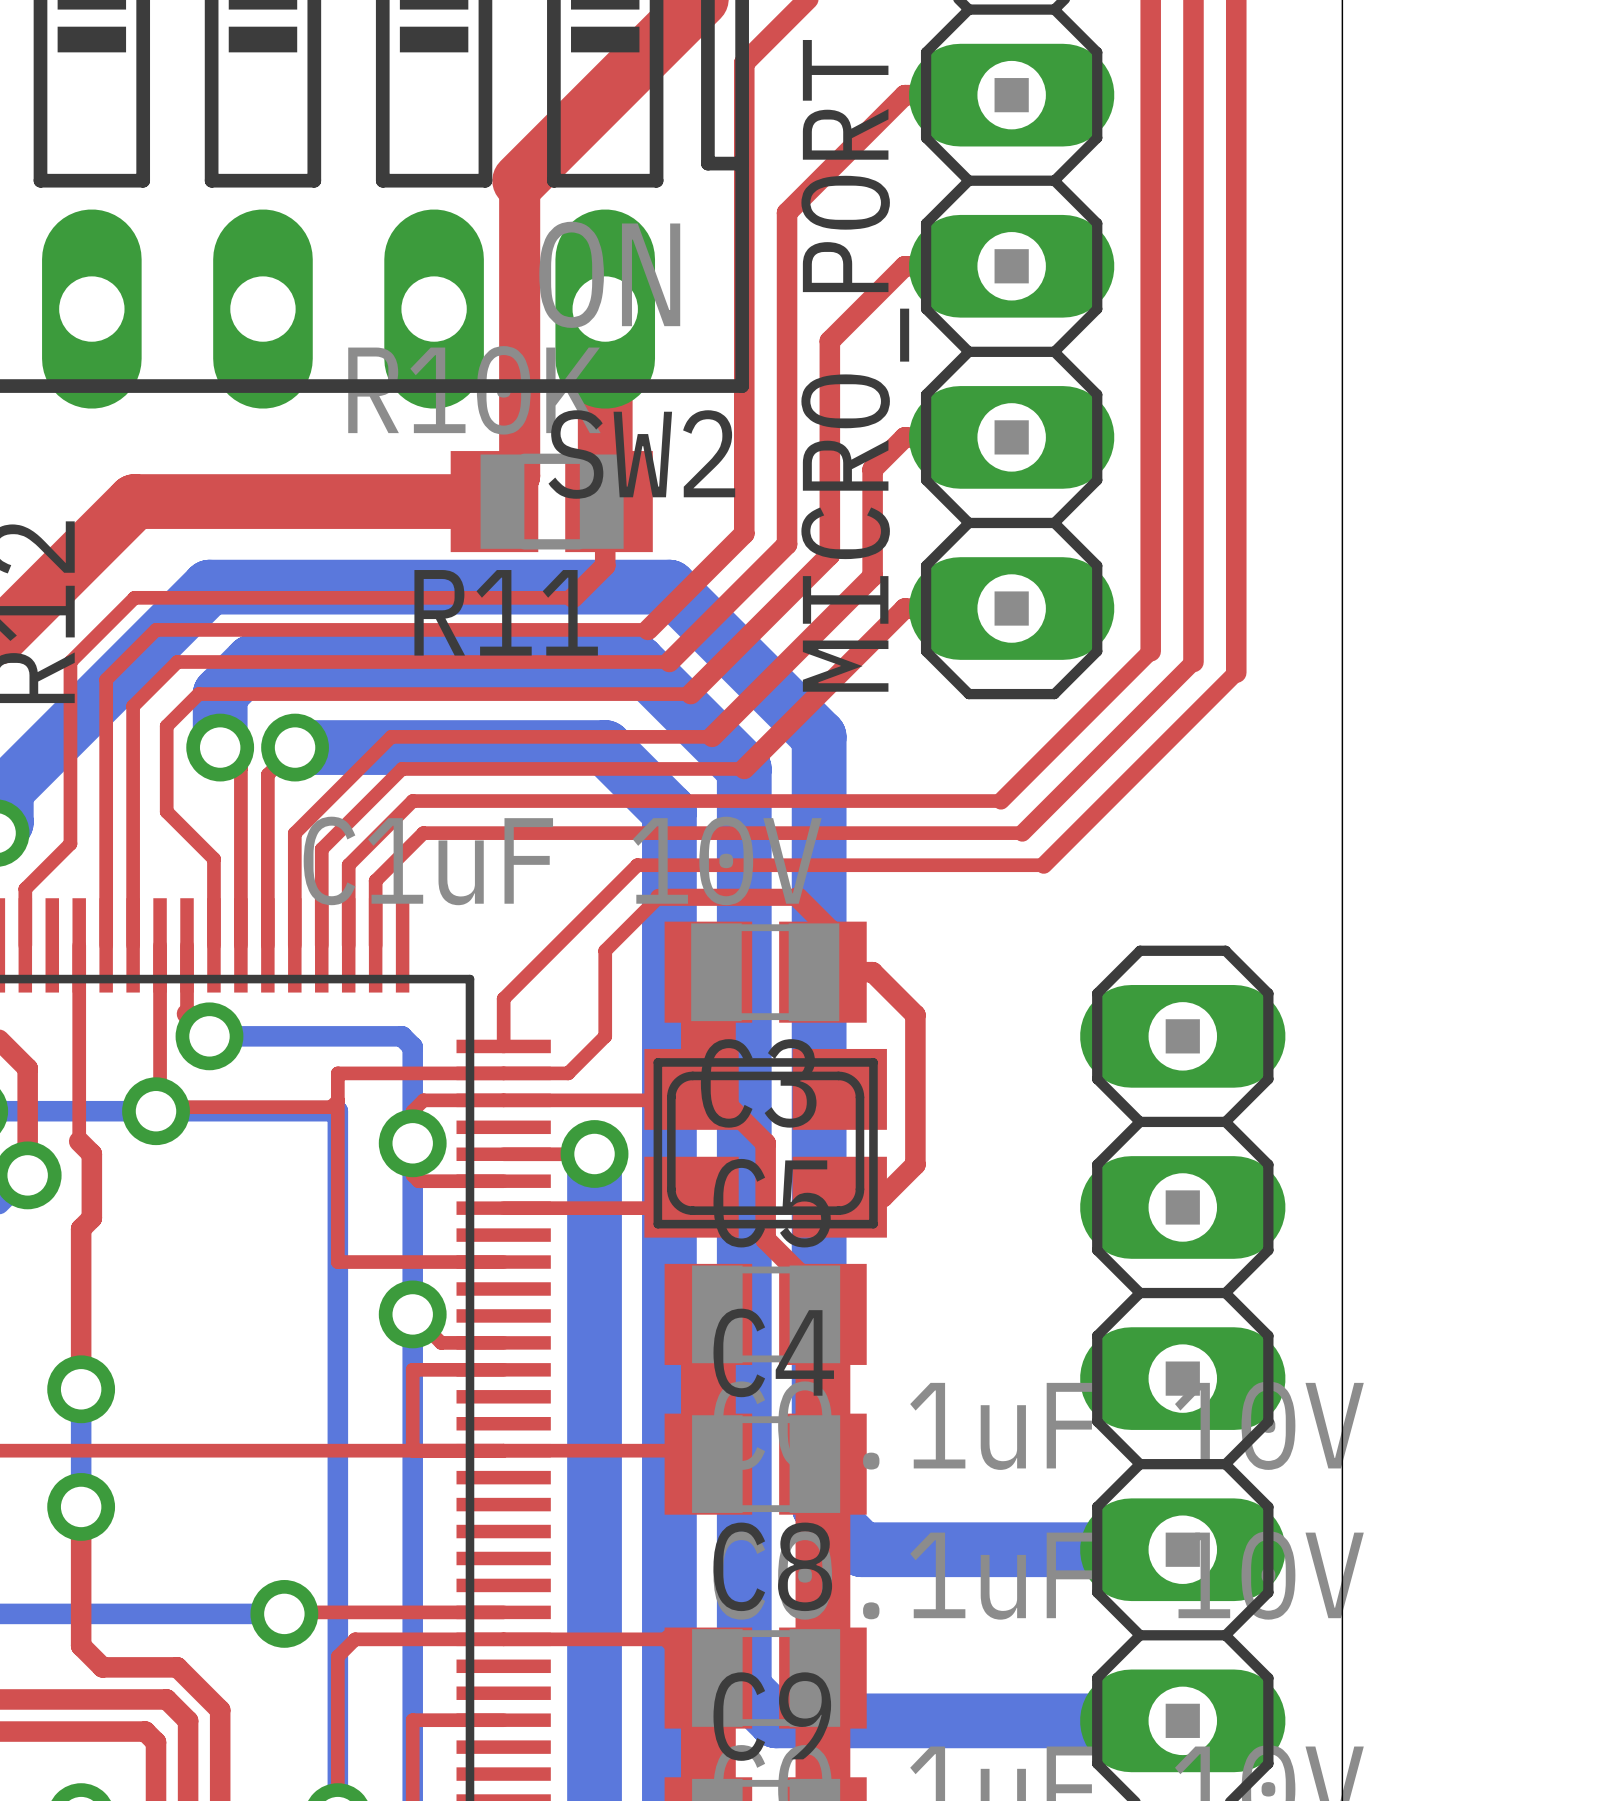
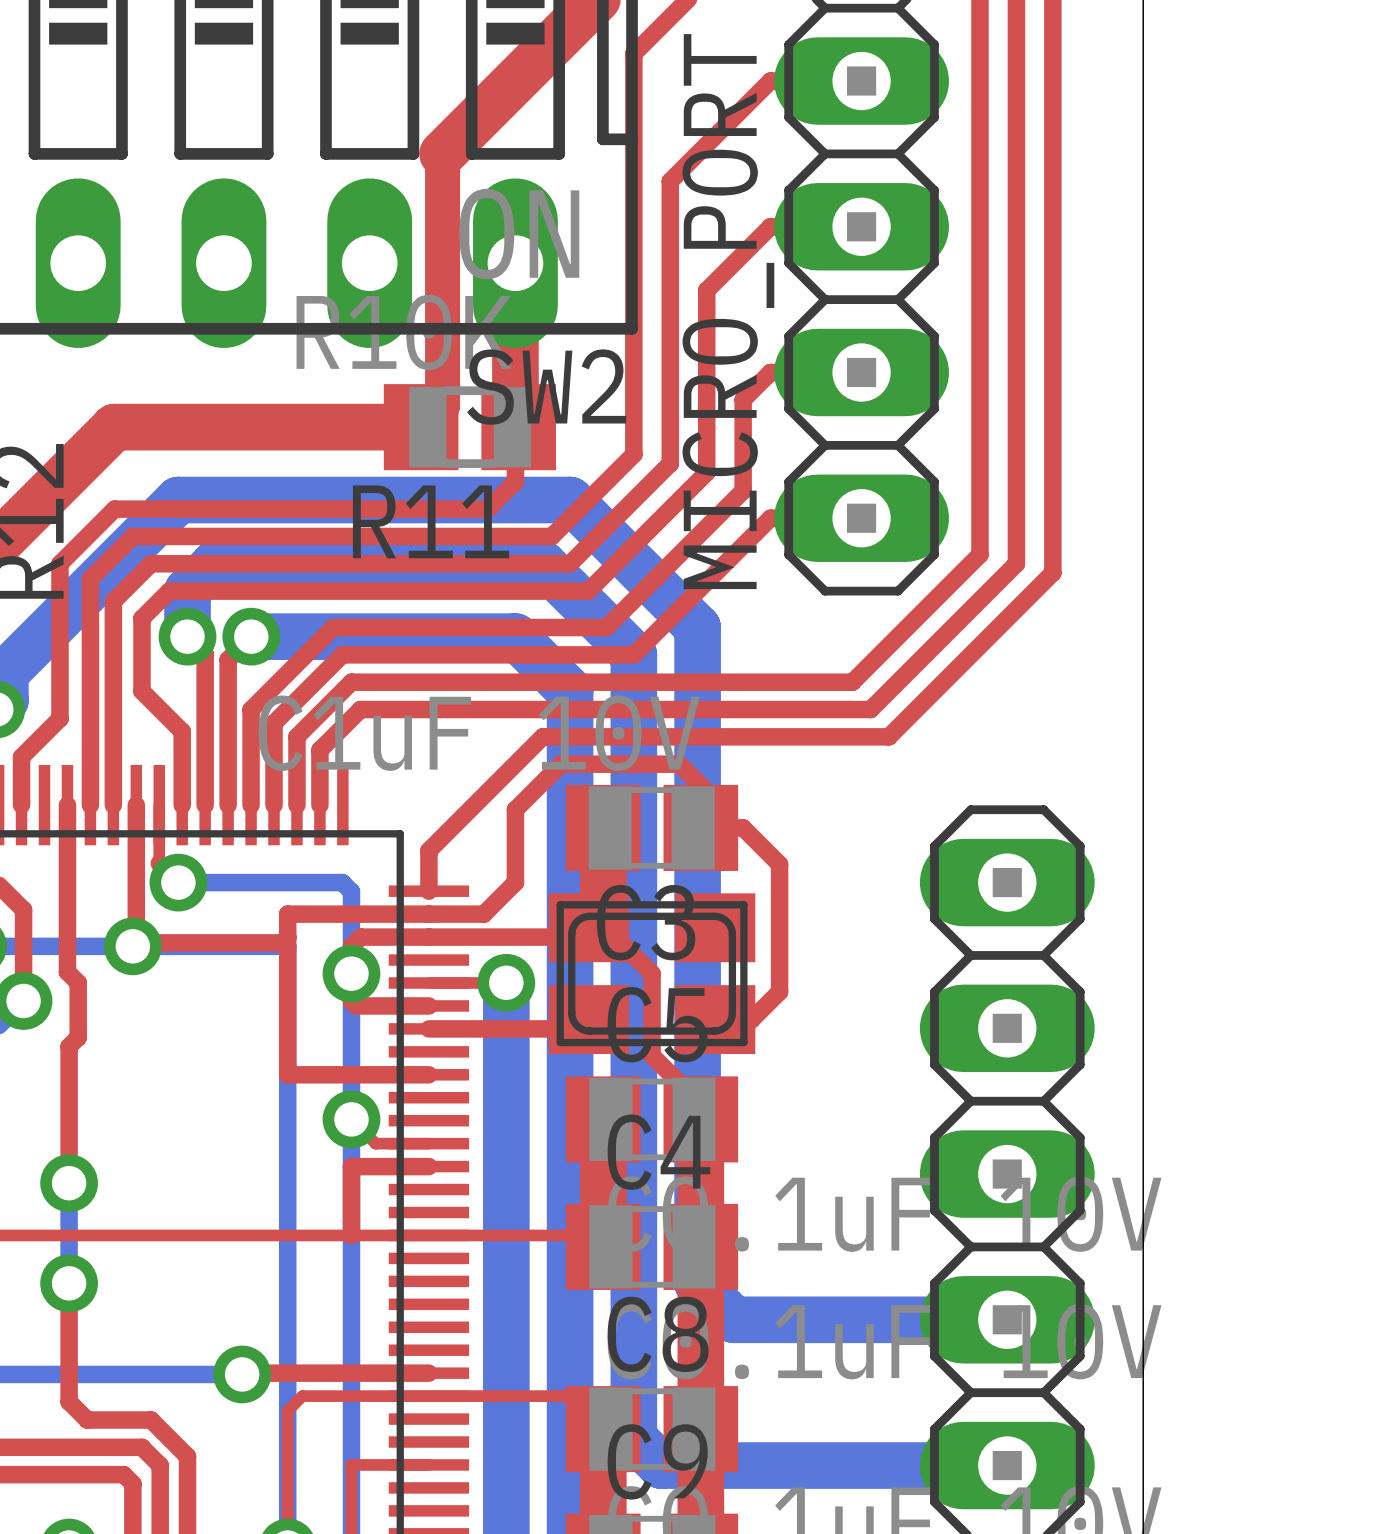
top track width: thin (573, 597) (134, 597) (70, 662) (70, 843) (25, 888) (25, 945) -> thick (488, 509) (114, 509) (60, 563) (60, 718) (21, 757) (21, 805)
top track width: thin (648, 629) (156, 629) (106, 679) (106, 945) -> thick (551, 536) (132, 536) (90, 578) (90, 805)
top track width: thin (1150, 651) (1000, 801) (412, 801) (348, 865) (348, 945) -> thick (979, 554) (852, 682) (351, 682) (296, 736) (296, 805)
top track width: thin (669, 662) (177, 662) (133, 706) (133, 945) -> thick (570, 563) (151, 563) (113, 601) (113, 805)
top track width: thin (1193, 662) (1022, 833) (423, 833) (375, 880) (375, 945) -> thick (1016, 563) (870, 709) (360, 709) (319, 750) (319, 805)
top track width: thin (1236, 672) (1043, 865) (637, 865) (503, 998) (503, 1046) -> thick (1052, 572) (888, 736) (542, 736) (428, 850) (428, 891)
top track width: thin (690, 694) (198, 694) (166, 726) (166, 811) (213, 858) (213, 945) -> thick (588, 591) (169, 591) (141, 618) (141, 691) (182, 731) (182, 805)
top track width: thin (712, 736) (391, 736) (294, 833) (294, 945) -> thick (606, 627) (333, 627) (251, 709) (251, 805)
top track width: thin (220, 747) (240, 768) (240, 945) -> thick (187, 636) (205, 654) (205, 805)
top track width: thin (295, 747) (267, 774) (267, 945) -> thick (251, 636) (228, 659) (228, 805)
top track width: thin (744, 768) (402, 768) (321, 849) (321, 945) -> thick (633, 654) (342, 654) (274, 723) (274, 805)
top track width: thin (797, 897) (658, 897) (605, 950) (605, 1036) (568, 1073) (337, 1073) (337, 1262) (503, 1262) -> thick (679, 764) (560, 764) (515, 809) (515, 882) (483, 914) (287, 914) (287, 1074) (428, 1074)
top track width: thin (79, 945) (79, 1141) -> thick (67, 805) (67, 972)
top track width: thin (160, 945) (160, 1107) (331, 1107) (337, 1100) -> thick (136, 805) (136, 942) (282, 942) (287, 937)
top track width: thin (680, 1100) (423, 1100) (412, 1111) (412, 1175) (418, 1181) (503, 1181) -> thick (579, 937) (360, 937) (351, 946) (351, 1001) (356, 1005) (428, 1005)
top track width: thin (503, 1208) (680, 1208) -> thick (428, 1028) (579, 1028)
top track width: thin (503, 1369) (412, 1369) (412, 1450) -> thick (428, 1166) (351, 1166) (351, 1235)
top track width: thin (503, 1612) (285, 1612) (284, 1613) -> thick (428, 1373) (242, 1374)

